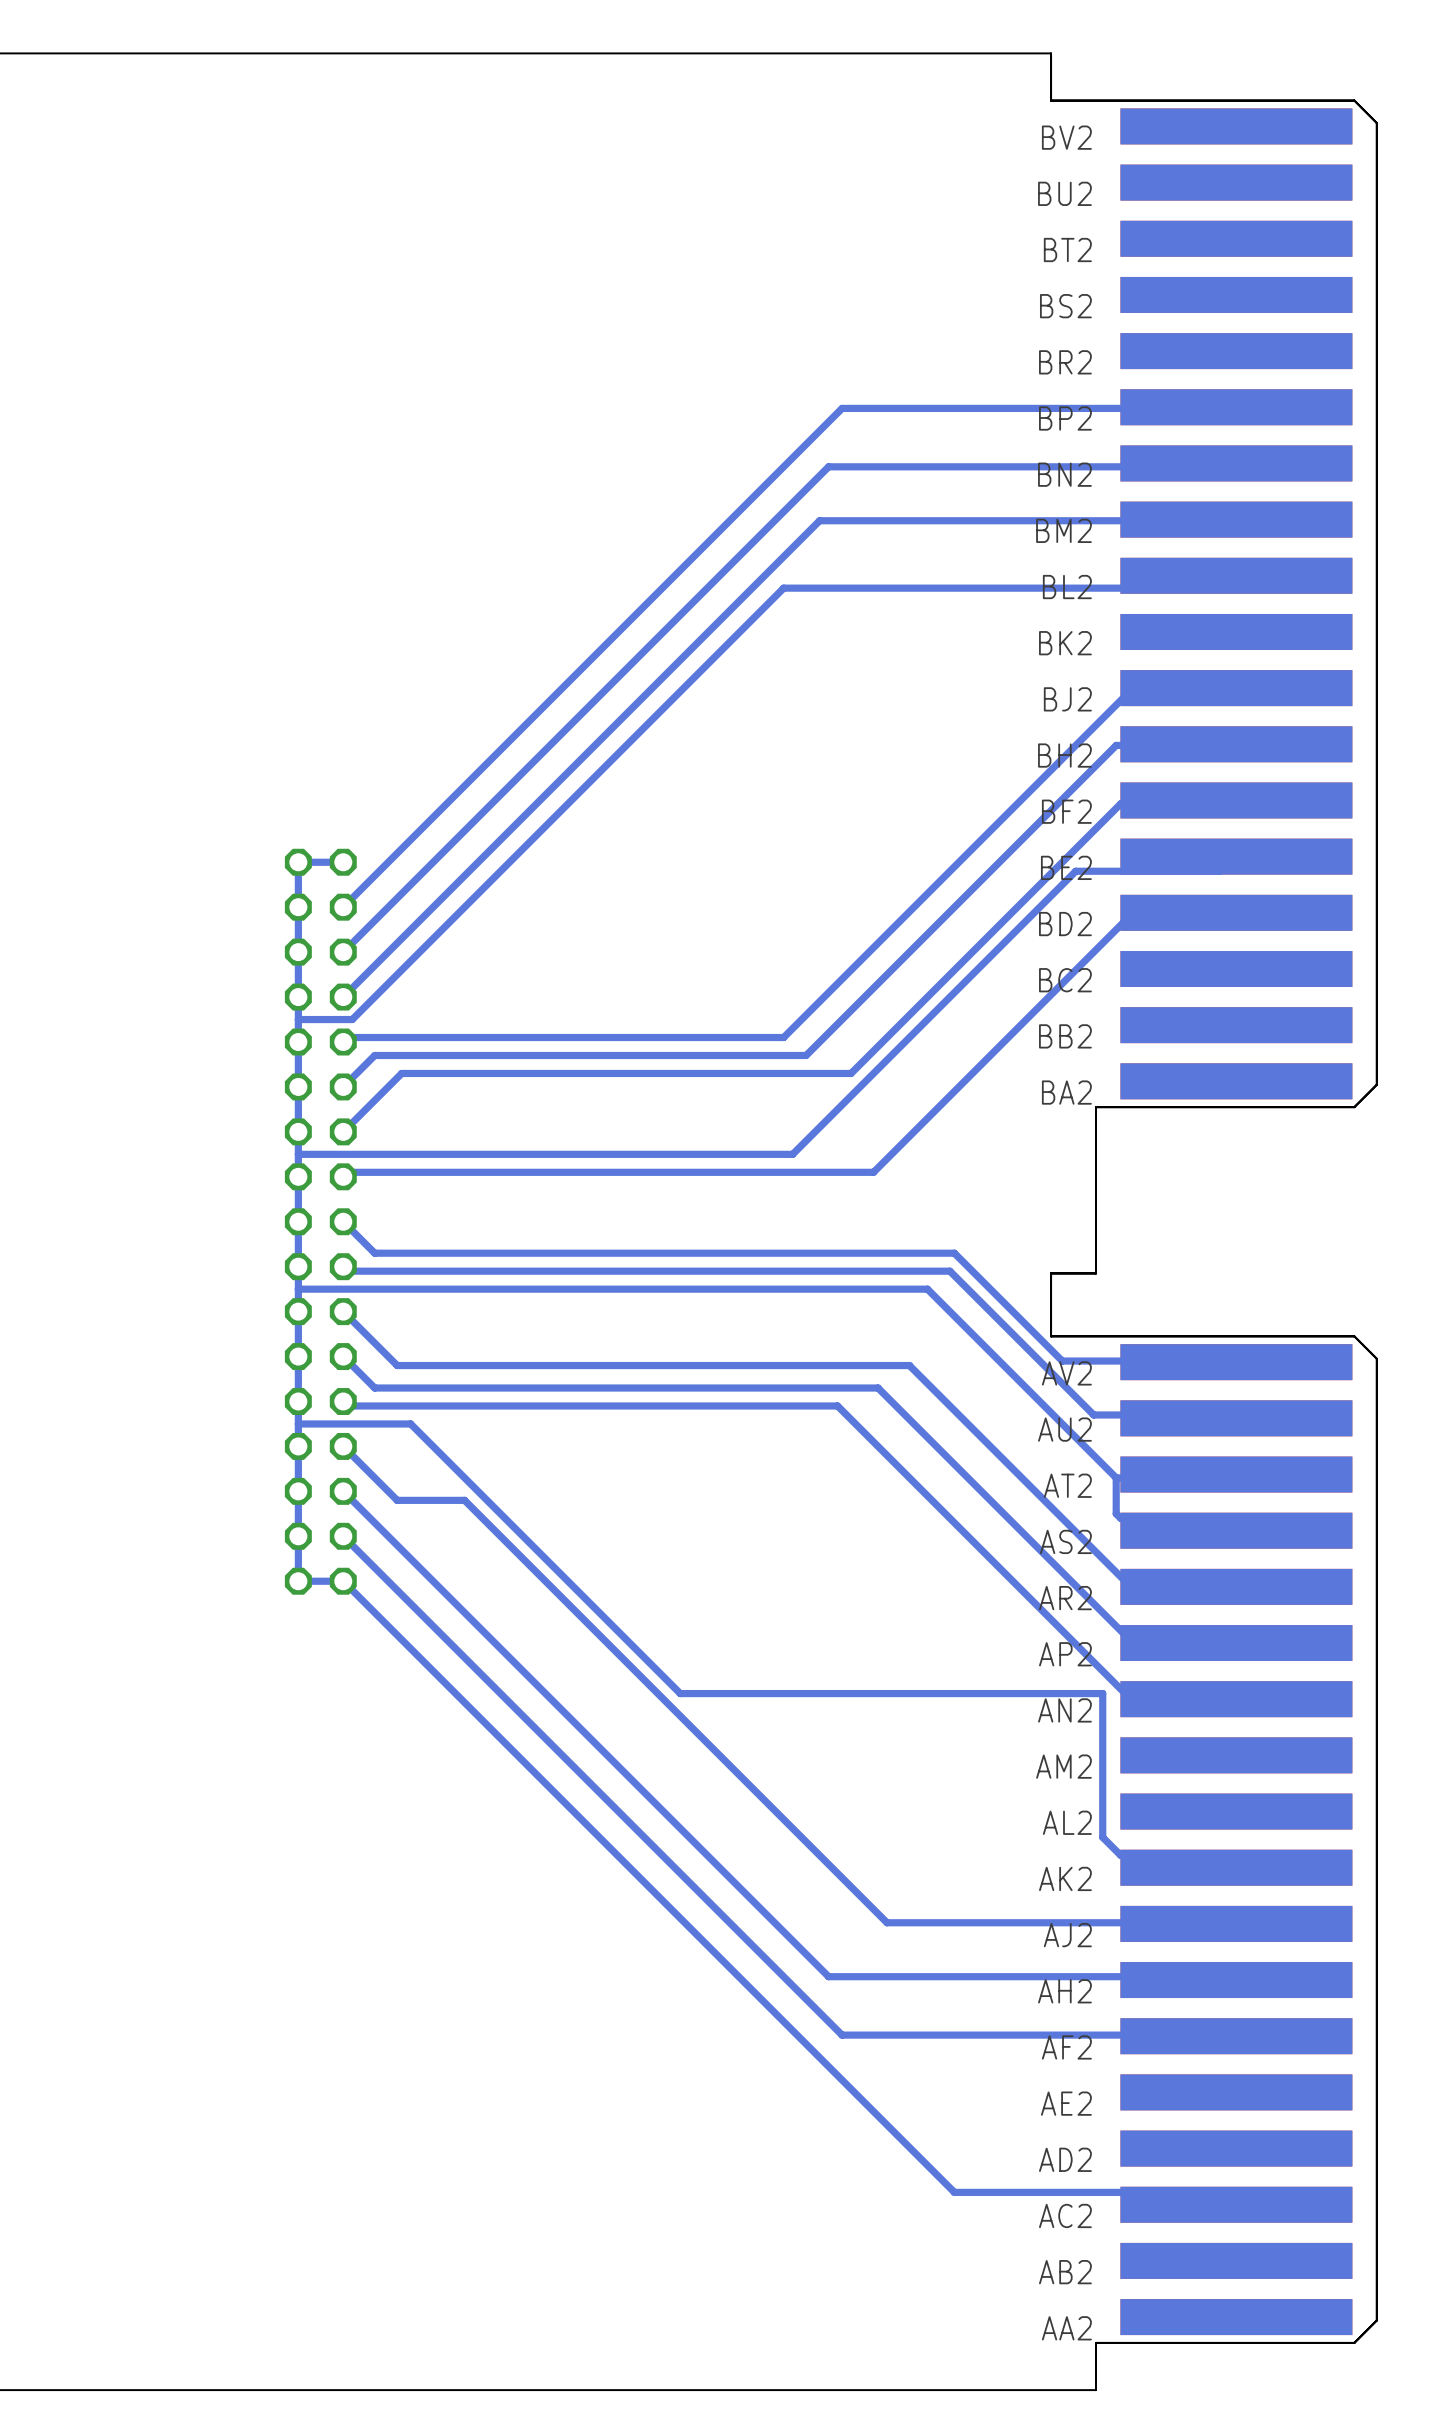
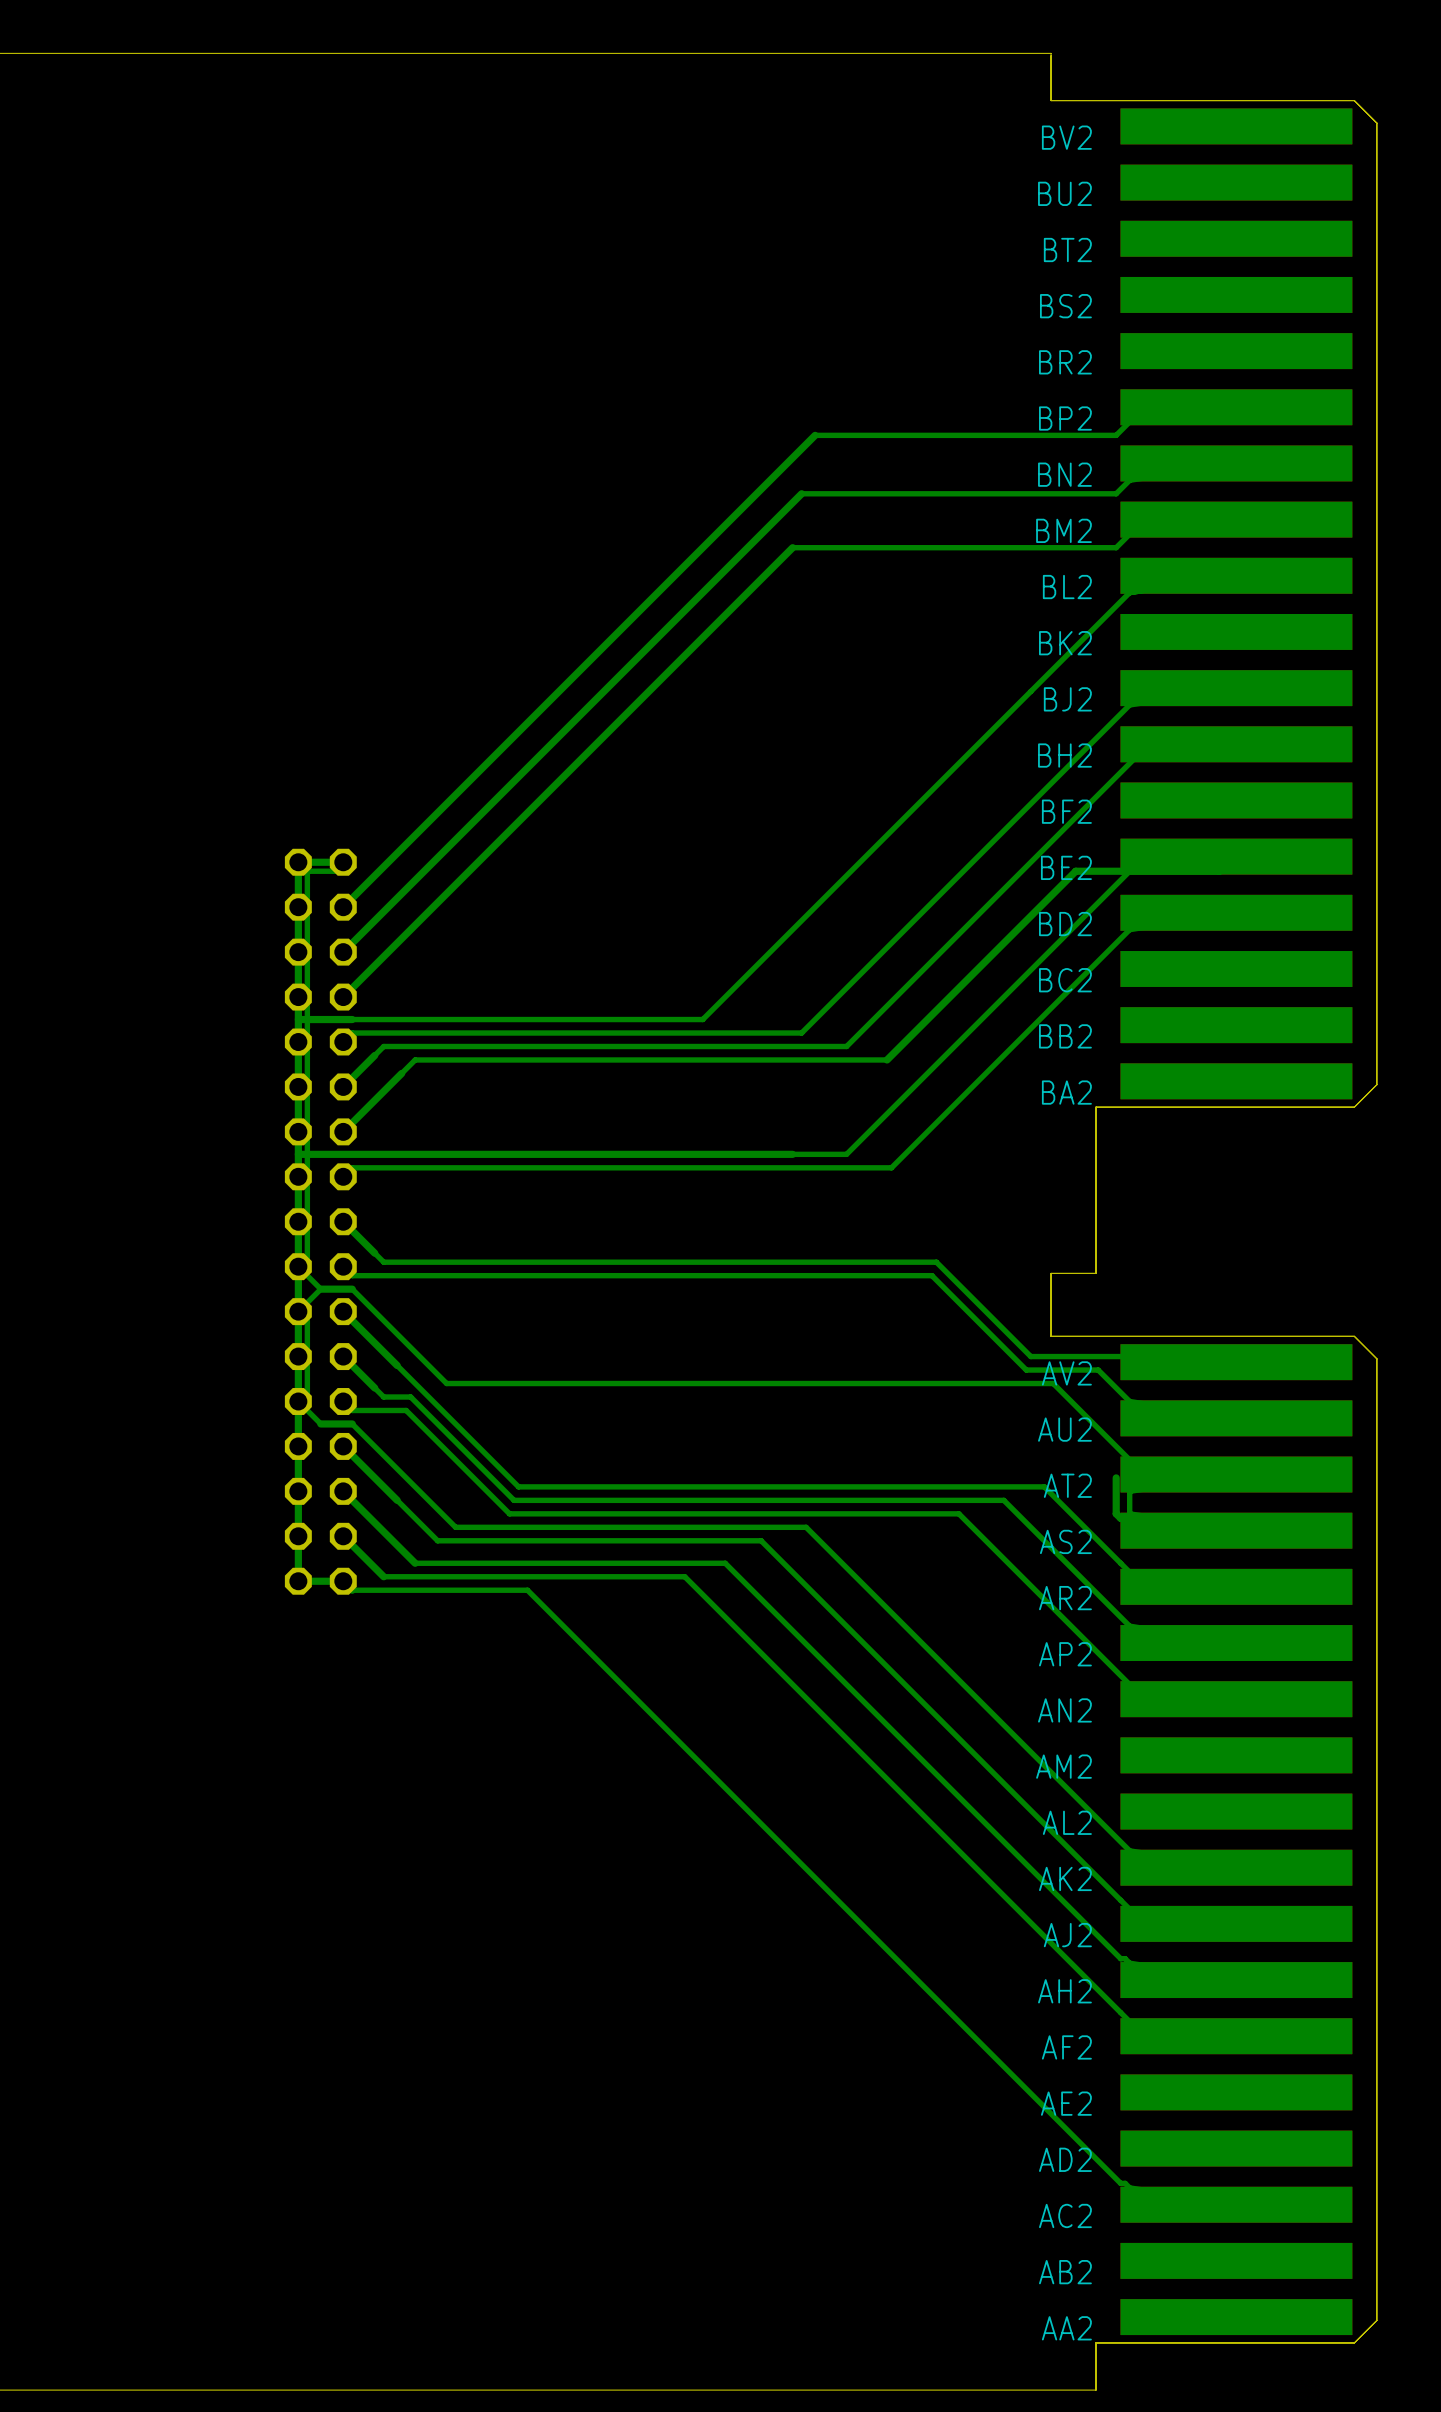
bottom track: (1236, 407) (842, 408) (815, 435) -> (1236, 407) (1129, 421) (1116, 435) (815, 435)
bottom track: (1236, 463) (1233, 466) (828, 466) (801, 493) -> (1236, 463) (1129, 480) (1116, 493) (801, 493)
bottom track: (1236, 519) (819, 520) (792, 547) -> (1236, 519) (1129, 534) (1116, 547) (792, 547)
bottom track: (1236, 575) (1224, 588) (783, 588) (352, 1019) -> (1236, 575) (1129, 592) (702, 1019) (352, 1019)
bottom track: (1236, 688) (1233, 691) (1129, 691) (783, 1037) (347, 1037) -> (1236, 688) (1129, 704) (801, 1033) (352, 1033) (347, 1037)
bottom track: (1236, 744) (1116, 745) (806, 1055) (374, 1055) -> (1129, 758) (1236, 744) (1134, 758) (846, 1046) (383, 1046) (374, 1055)
bottom track: (1236, 800) (1233, 803) (1120, 803) (851, 1073) (401, 1073) -> none
bottom track: none -> (1236, 856) (1129, 871) (846, 1154) (792, 1154)
bottom track: none -> (343, 862) (334, 871) (307, 871)
bottom track: (1236, 912) (1233, 916) (1129, 916) (873, 1172) (347, 1172) -> (1236, 912) (1129, 929) (891, 1167) (352, 1167) (347, 1172)
bottom track: (887, 1059) (792, 1154) -> (887, 1059) (415, 1059) (401, 1073)
bottom track: (374, 1253) (954, 1253) (1062, 1361) (1236, 1362) -> (374, 1253) (383, 1262) (936, 1262) (1030, 1356) (1129, 1356) (1236, 1362)
bottom track: (347, 1271) (949, 1271) (1093, 1414) (1233, 1414) (1236, 1418) -> (347, 1271) (352, 1275) (931, 1275) (1026, 1370) (1098, 1370) (1129, 1401) (1236, 1418)
bottom track: (320, 1289) (298, 1289) -> none
bottom track: (352, 1289) (927, 1289) (1116, 1477) (1233, 1477) (1236, 1474) -> (352, 1289) (446, 1383) (1053, 1383) (1129, 1459) (1236, 1474) (1129, 1491) (1129, 1513) (1236, 1530)
bottom track: (397, 1365) (909, 1365) (1129, 1585) (1236, 1586) -> (397, 1365) (518, 1486) (1044, 1486) (1129, 1572) (1236, 1586)
bottom track: (374, 1388) (878, 1388) (1129, 1639) (1233, 1639) (1236, 1643) -> (374, 1388) (383, 1397) (410, 1397) (514, 1500) (1003, 1500) (1129, 1626) (1236, 1643)
bottom track: (347, 1405) (837, 1405) (1129, 1698) (1236, 1699) -> (347, 1405) (352, 1410) (406, 1410) (509, 1513) (958, 1513) (1129, 1684) (1236, 1699)
bottom track: (320, 1423) (298, 1423) -> (320, 1423) (298, 1401) (307, 1392) (307, 1365) (298, 1356) (307, 1347) (307, 1320) (298, 1311) (320, 1289) (298, 1266) (307, 1257) (307, 1230) (298, 1221) (307, 1212) (307, 1185) (298, 1176) (307, 1167) (307, 1140) (298, 1131) (307, 1122) (307, 1095) (298, 1086) (307, 1077) (307, 1050) (298, 1042) (307, 1033) (307, 1006) (298, 997) (307, 988) (307, 961) (298, 952) (307, 943) (307, 916) (298, 907) (307, 898) (307, 871)
bottom track: (352, 1423) (410, 1423) (680, 1693) (1102, 1693) (1102, 1837) (1120, 1855) (1224, 1855) (1236, 1867) -> (352, 1423) (455, 1527) (806, 1527) (1129, 1850) (1236, 1867)
bottom track: (397, 1500) (464, 1500) (887, 1922) (1236, 1923) -> (397, 1500) (437, 1540) (761, 1540) (1129, 1909) (1236, 1923)
bottom track: (415, 1563) (828, 1976) (1233, 1976) (1236, 1980) -> (415, 1563) (725, 1563) (1120, 1958) (1125, 1958) (1129, 1963) (1236, 1980)
bottom track: (383, 1576) (842, 2035) (1236, 2036) -> (383, 1576) (684, 1576) (1129, 2021) (1236, 2036)
bottom track: (352, 1590) (954, 2192) (1224, 2192) (1236, 2204) -> (352, 1590) (527, 1590) (1120, 2183) (1125, 2183) (1129, 2187) (1236, 2204)

